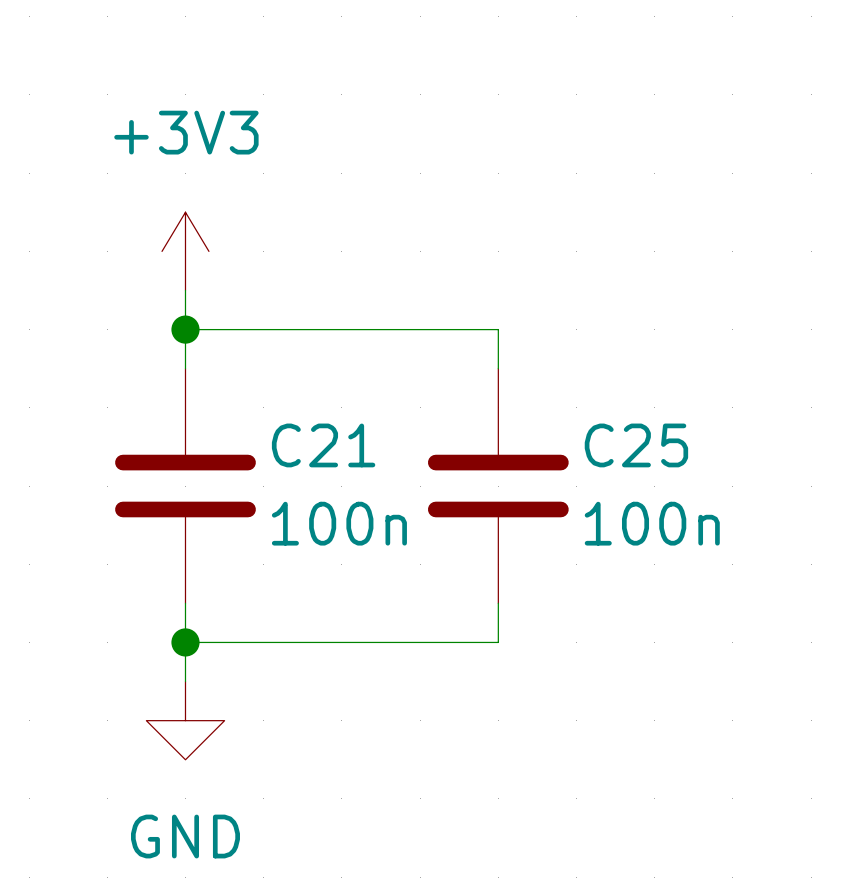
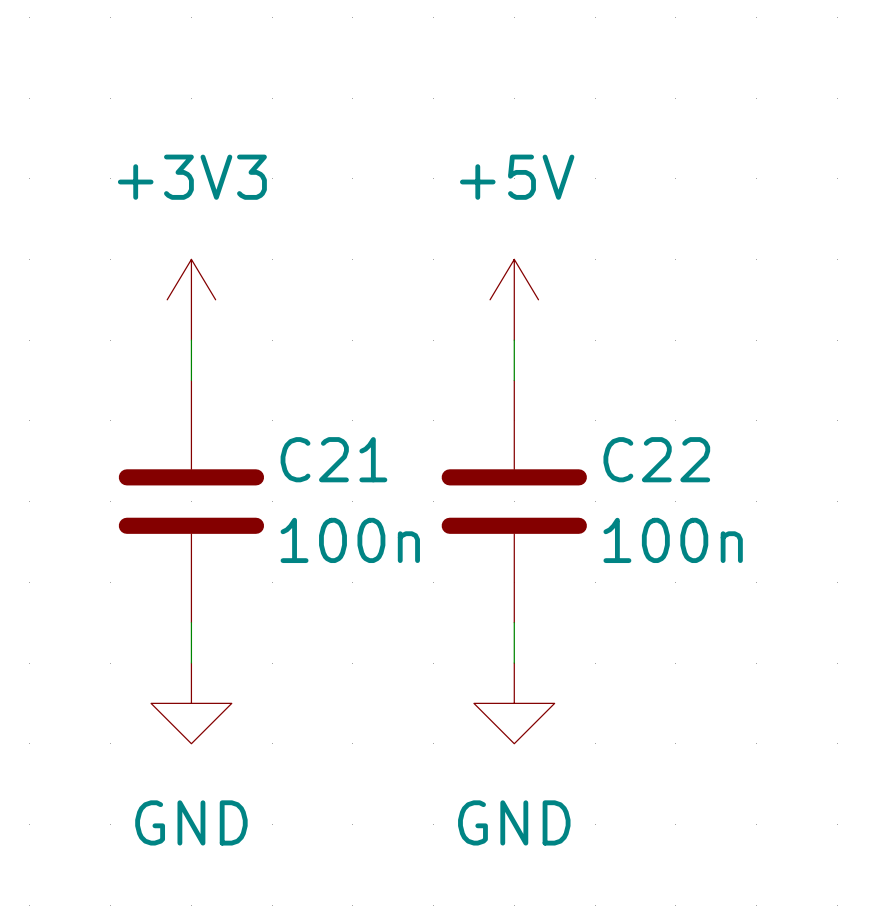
power symbol position: +3V3 (185, 251) -> +3V3 (191, 299)
wire: (185, 290) (185, 329) (498, 329) -> none
power symbol: none -> +5V (514, 299)
junction: (185, 329) -> none
C25 name: C25 (636, 445) -> C22 (656, 459)
junction: (185, 642) -> none
wire: (498, 642) (185, 642) (185, 681) -> none
power symbol: none -> GND (514, 703)
power symbol position: GND (185, 720) -> GND (191, 703)

